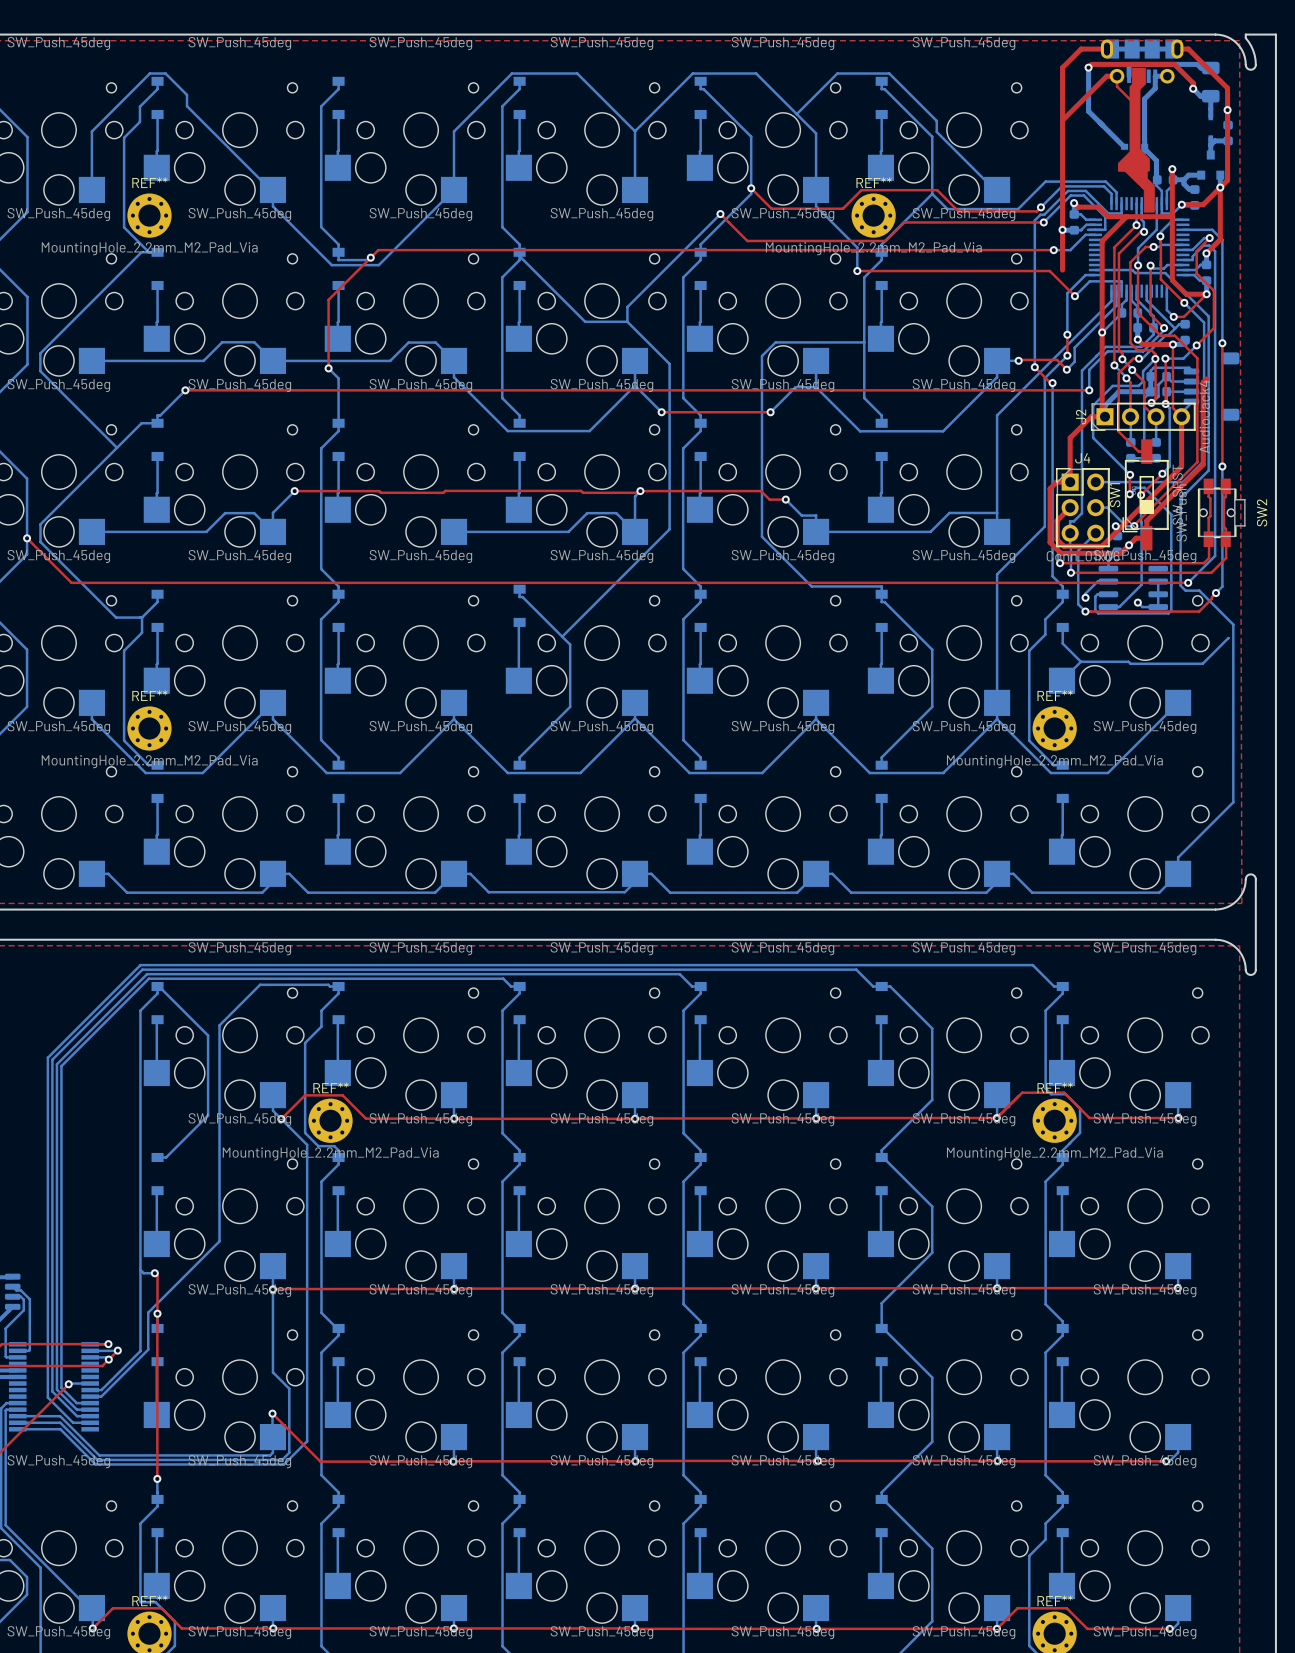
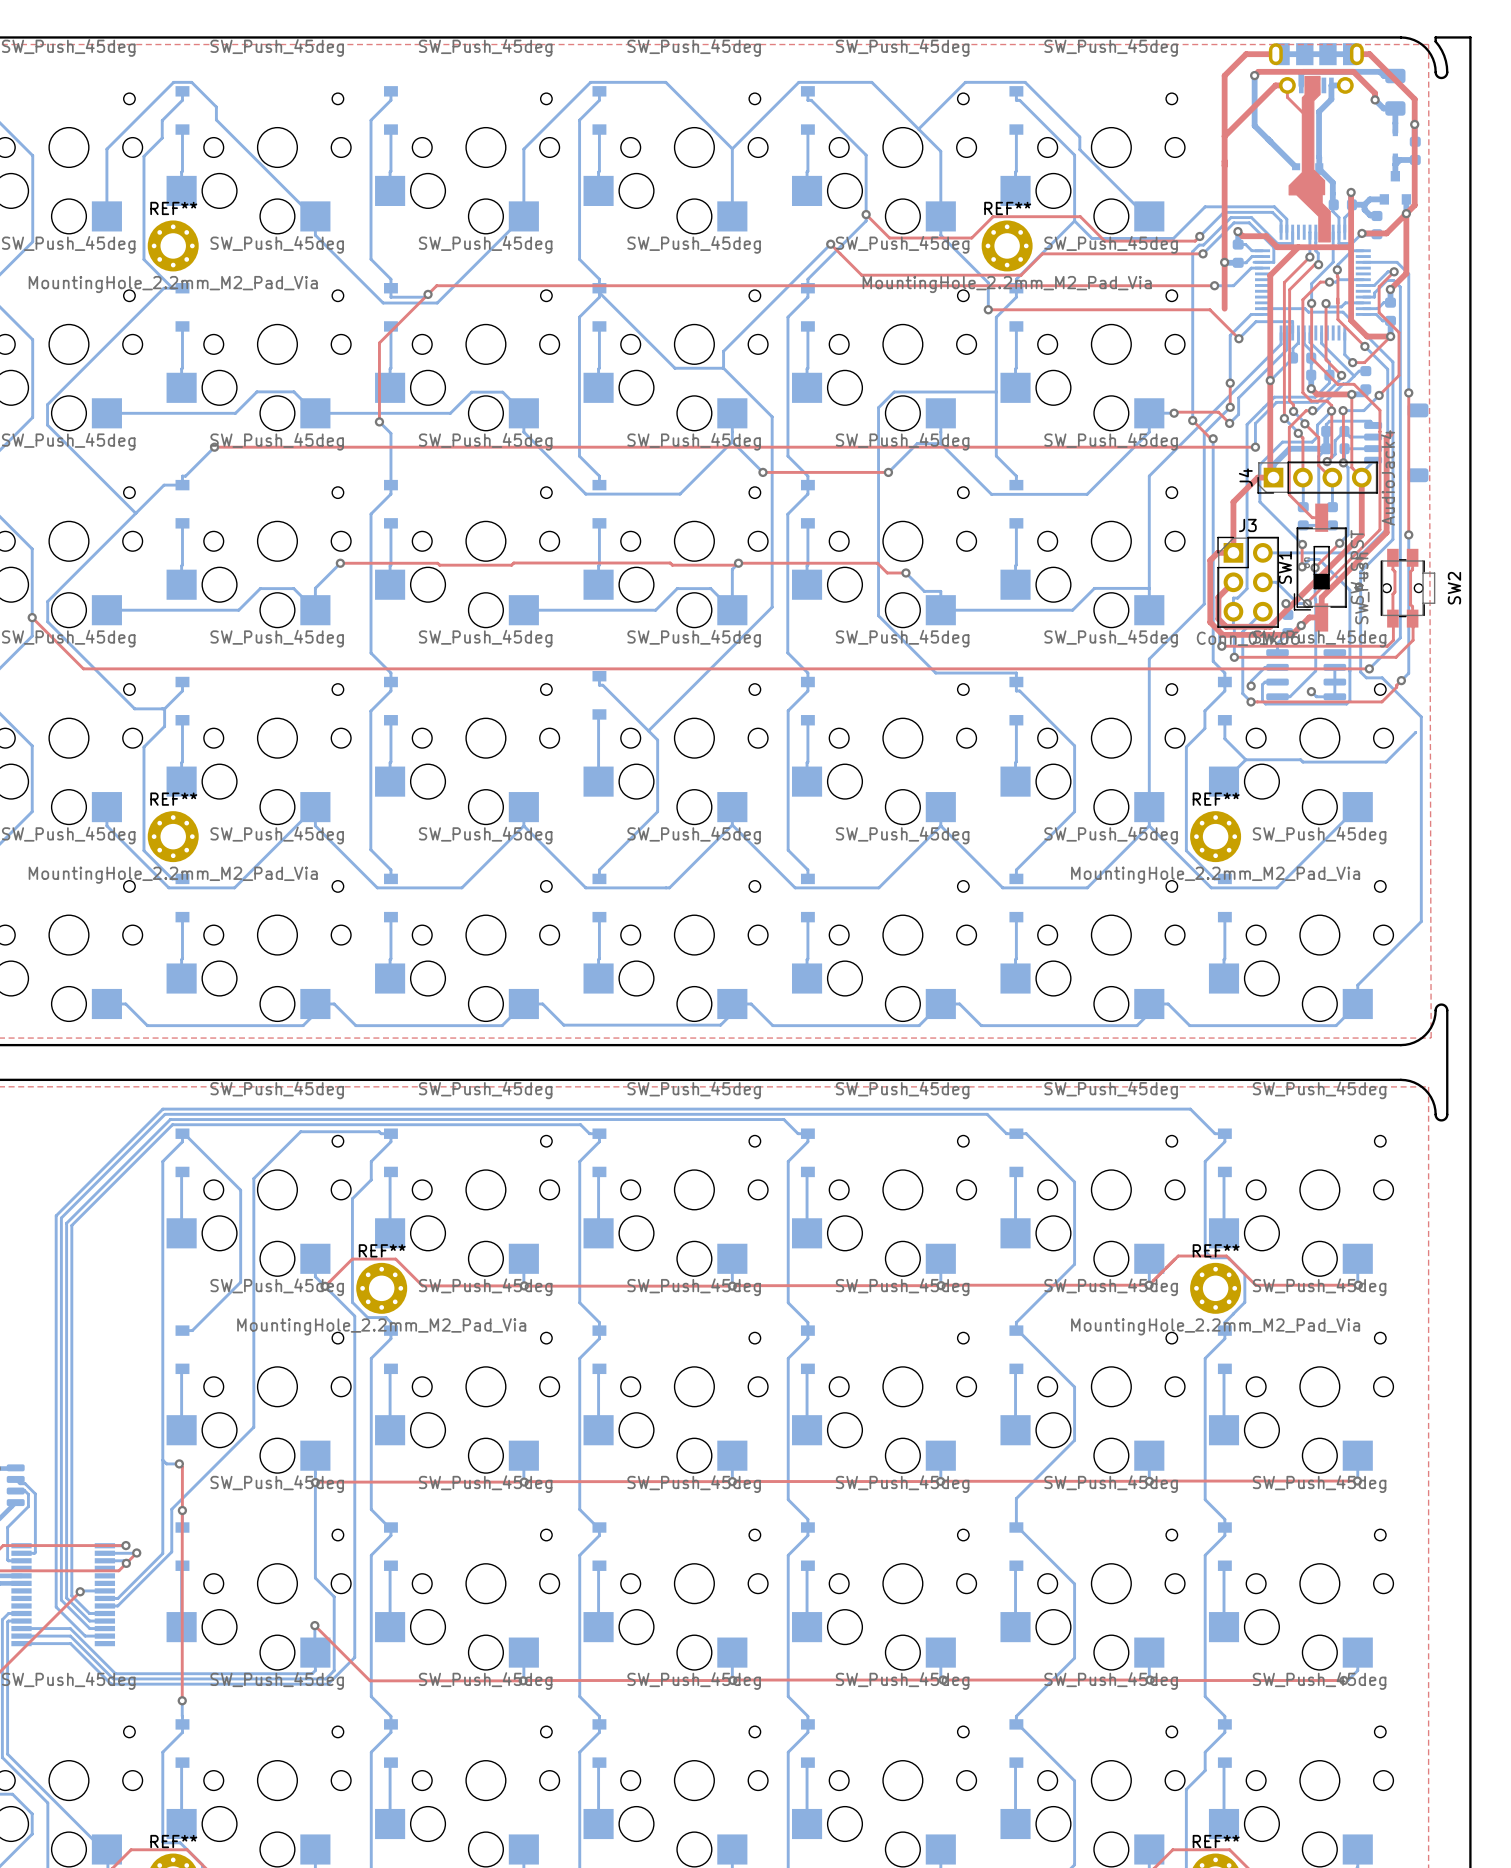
J2 name: J2 (1081, 416) -> J4 (1245, 477)
J4 name: J4 (1082, 458) -> J3 (1247, 525)

